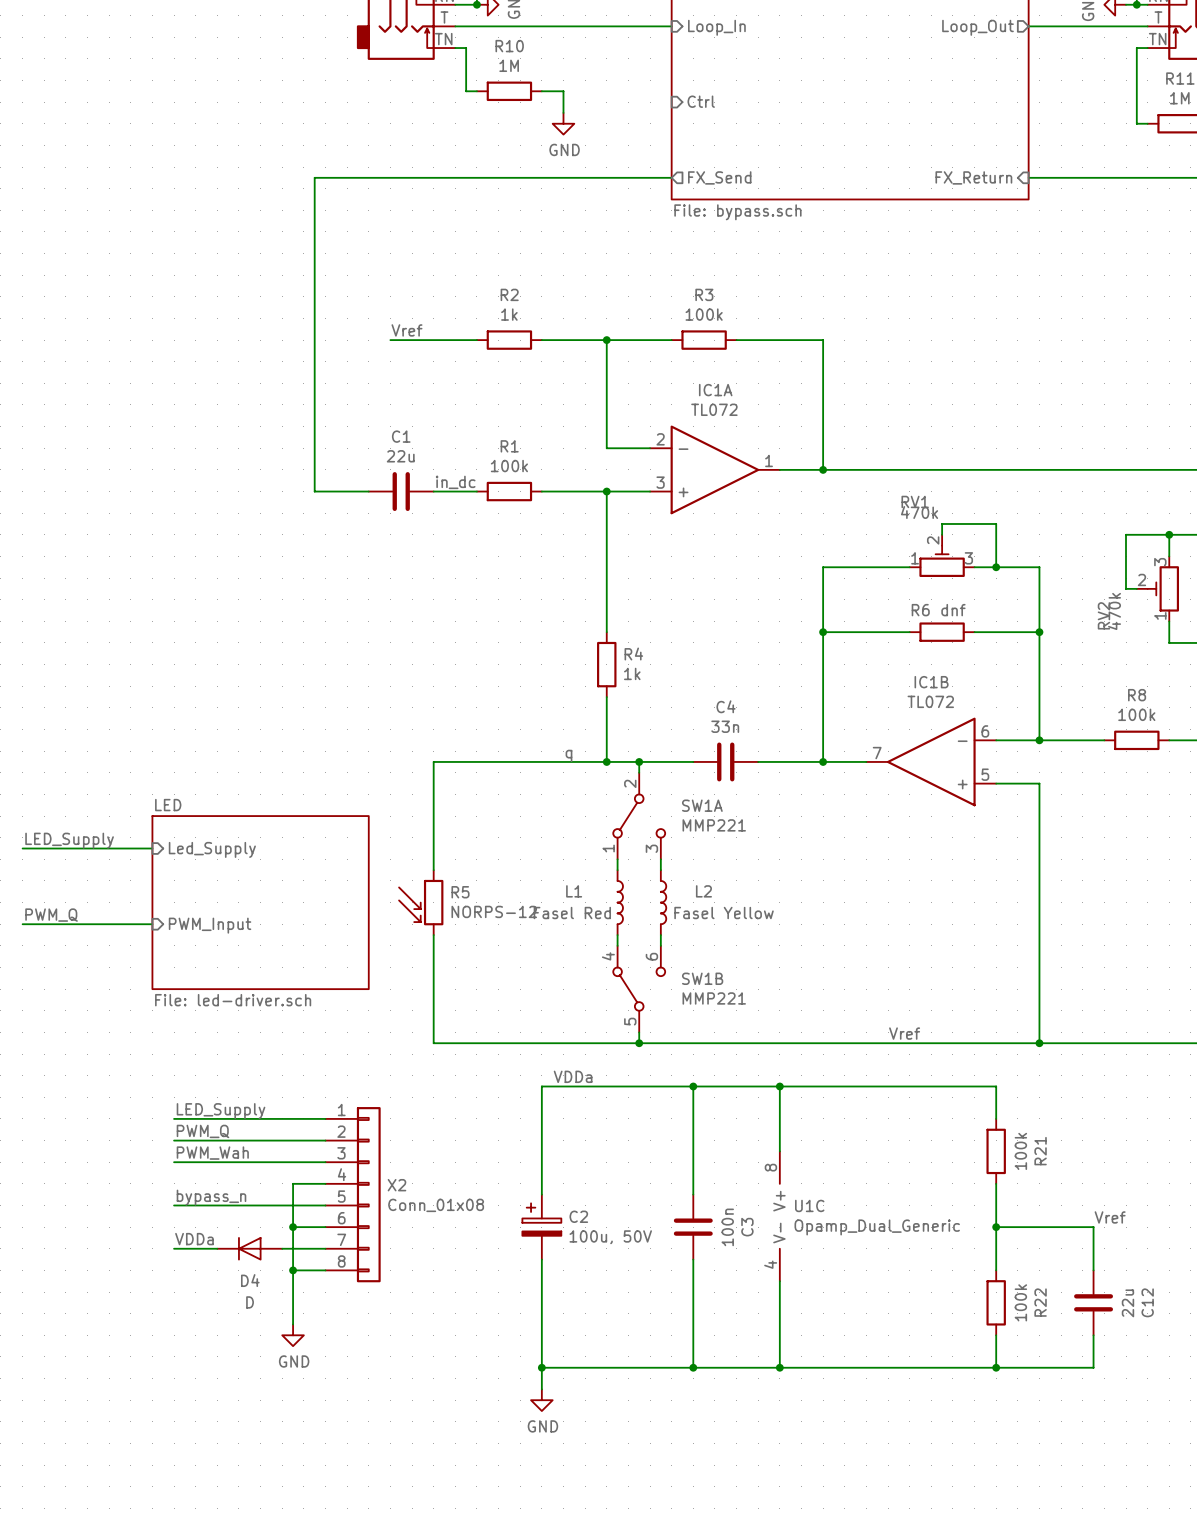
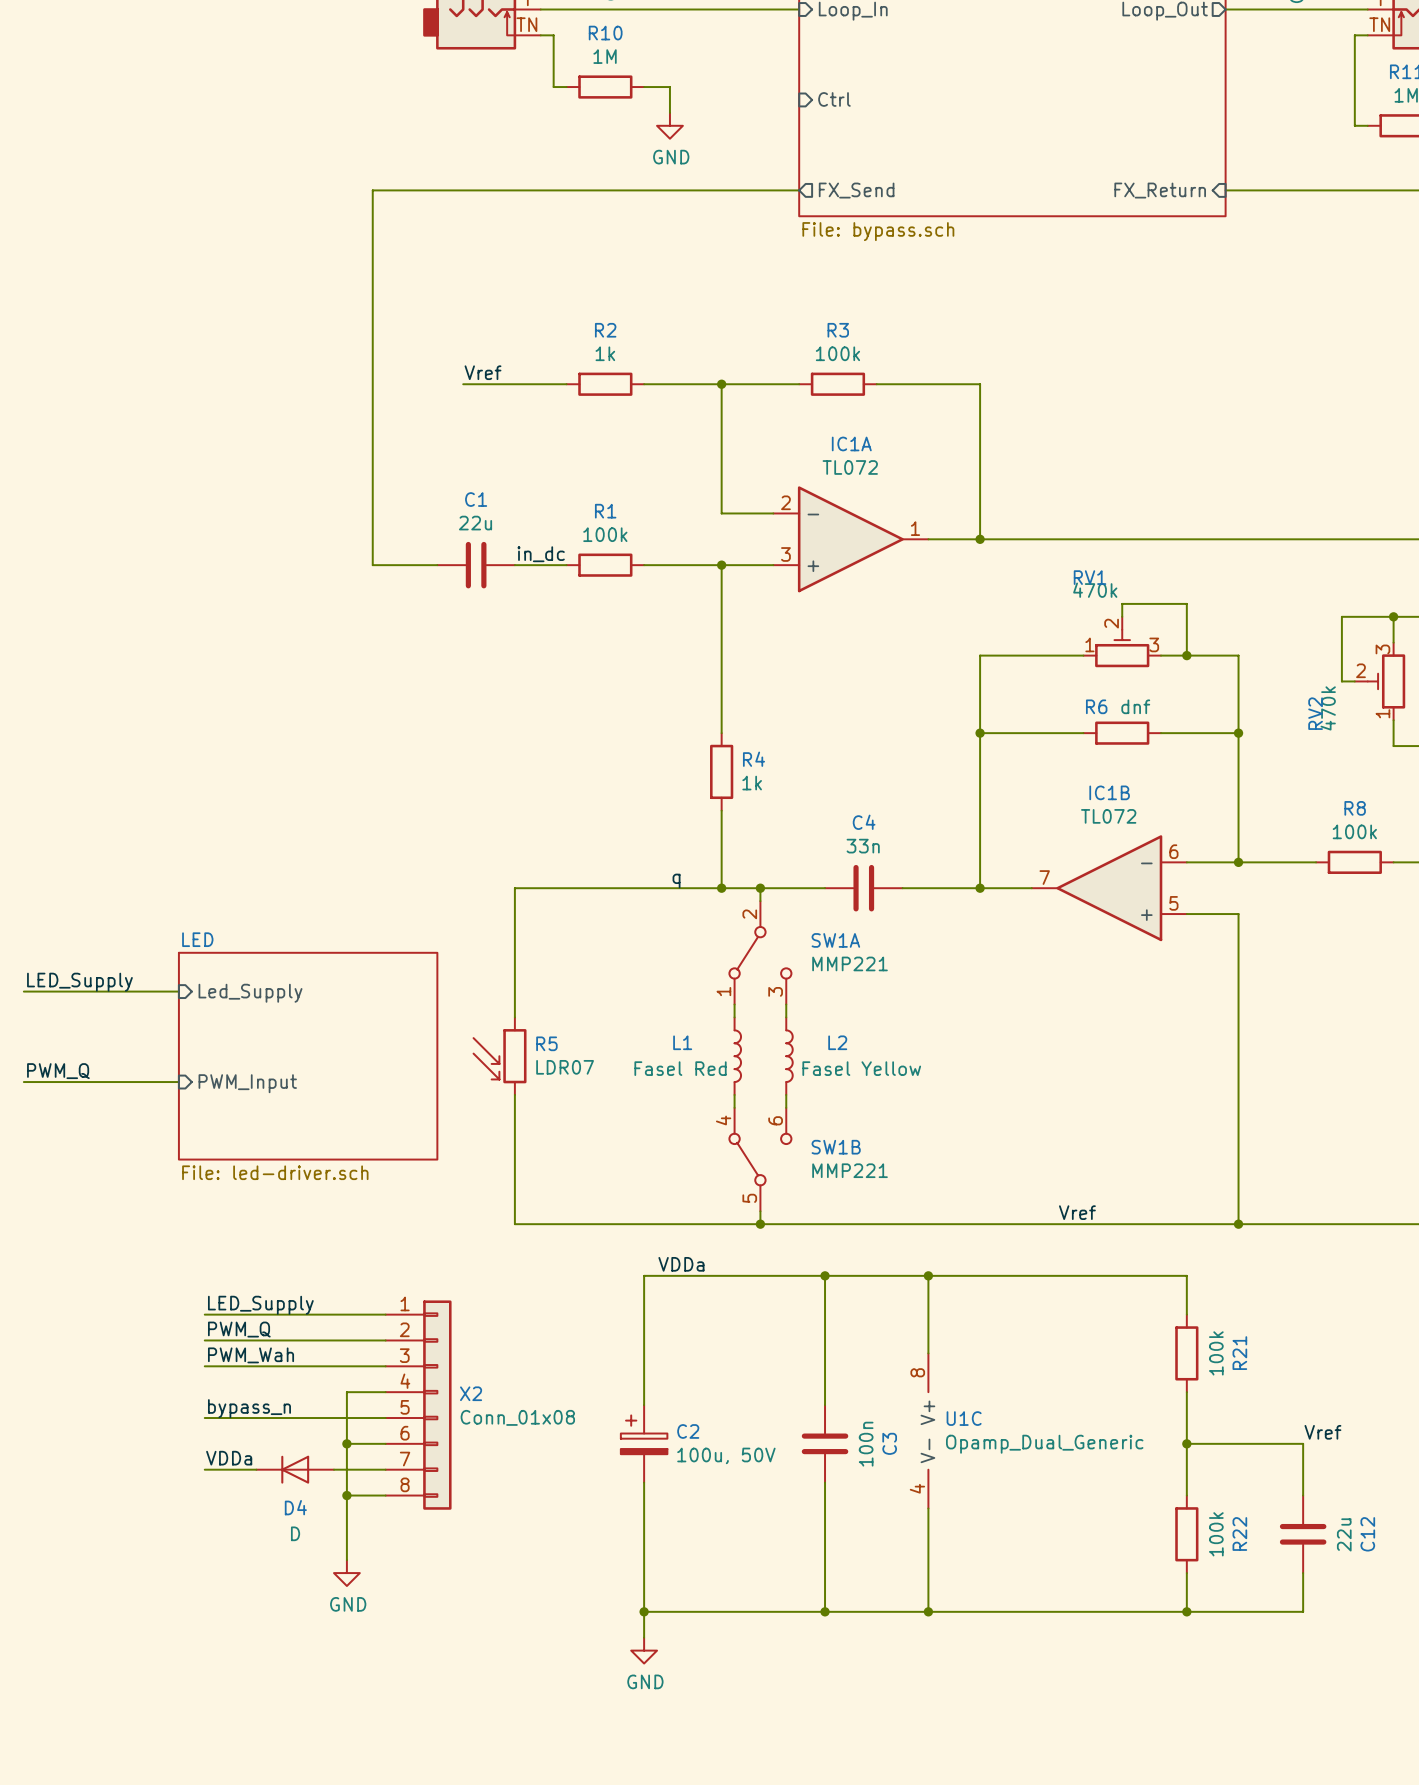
R5 value: NORPS-12 (494, 911) -> LDR07 (565, 1067)

